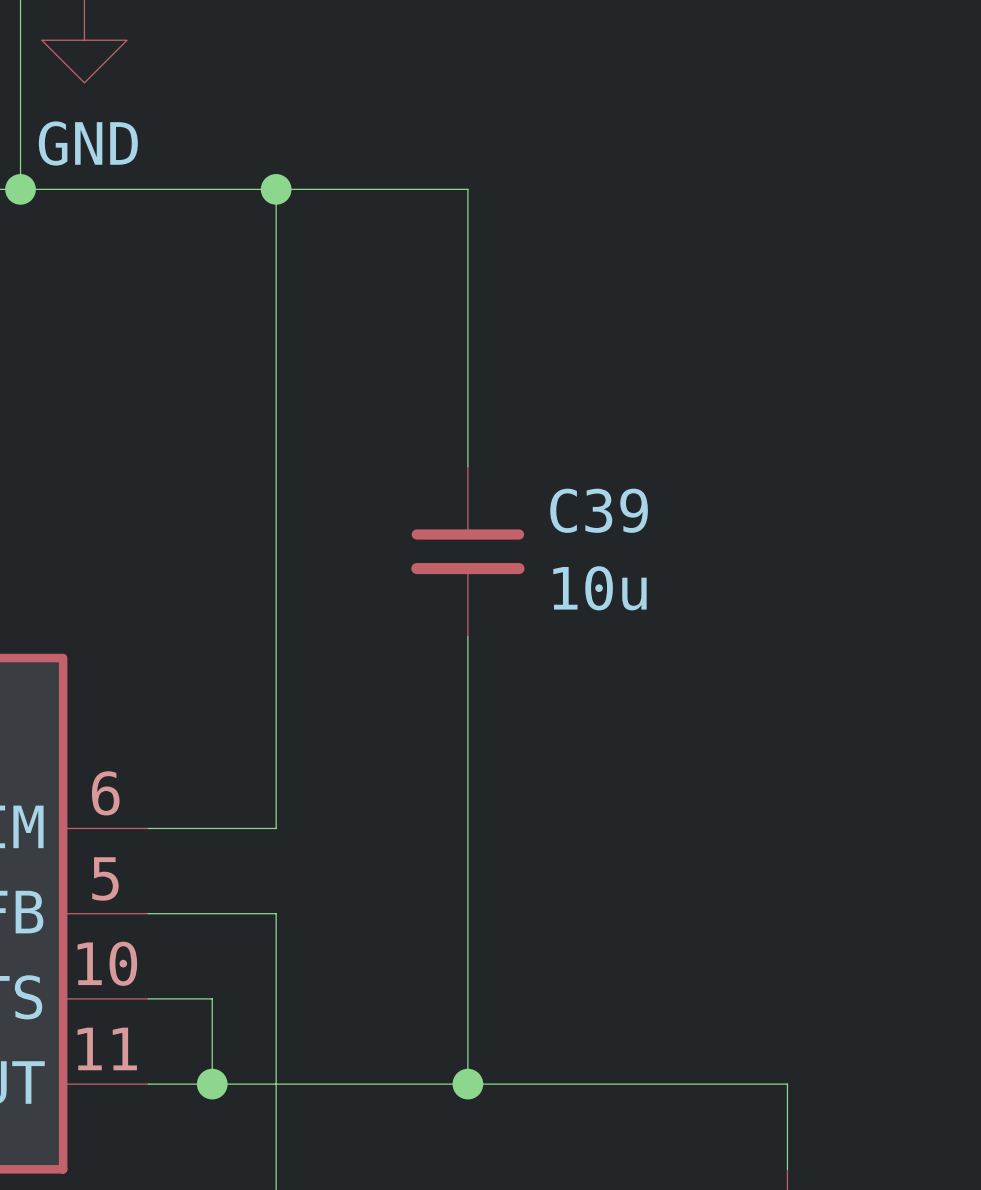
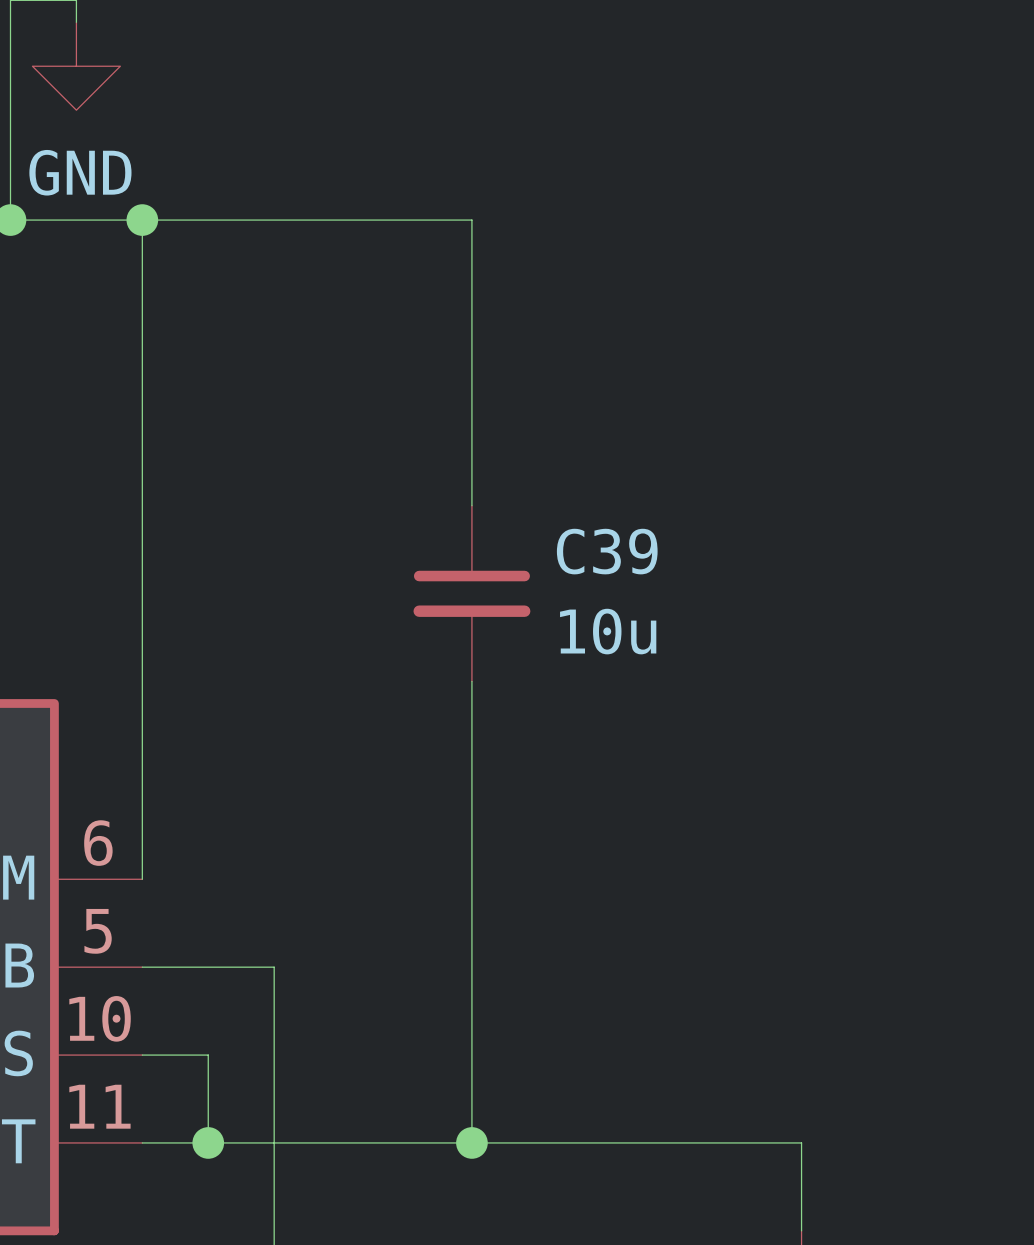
wire: (276, 189) (276, 828) (148, 828) -> (142, 220) (142, 879)
junction position: (276, 189) -> (142, 220)

